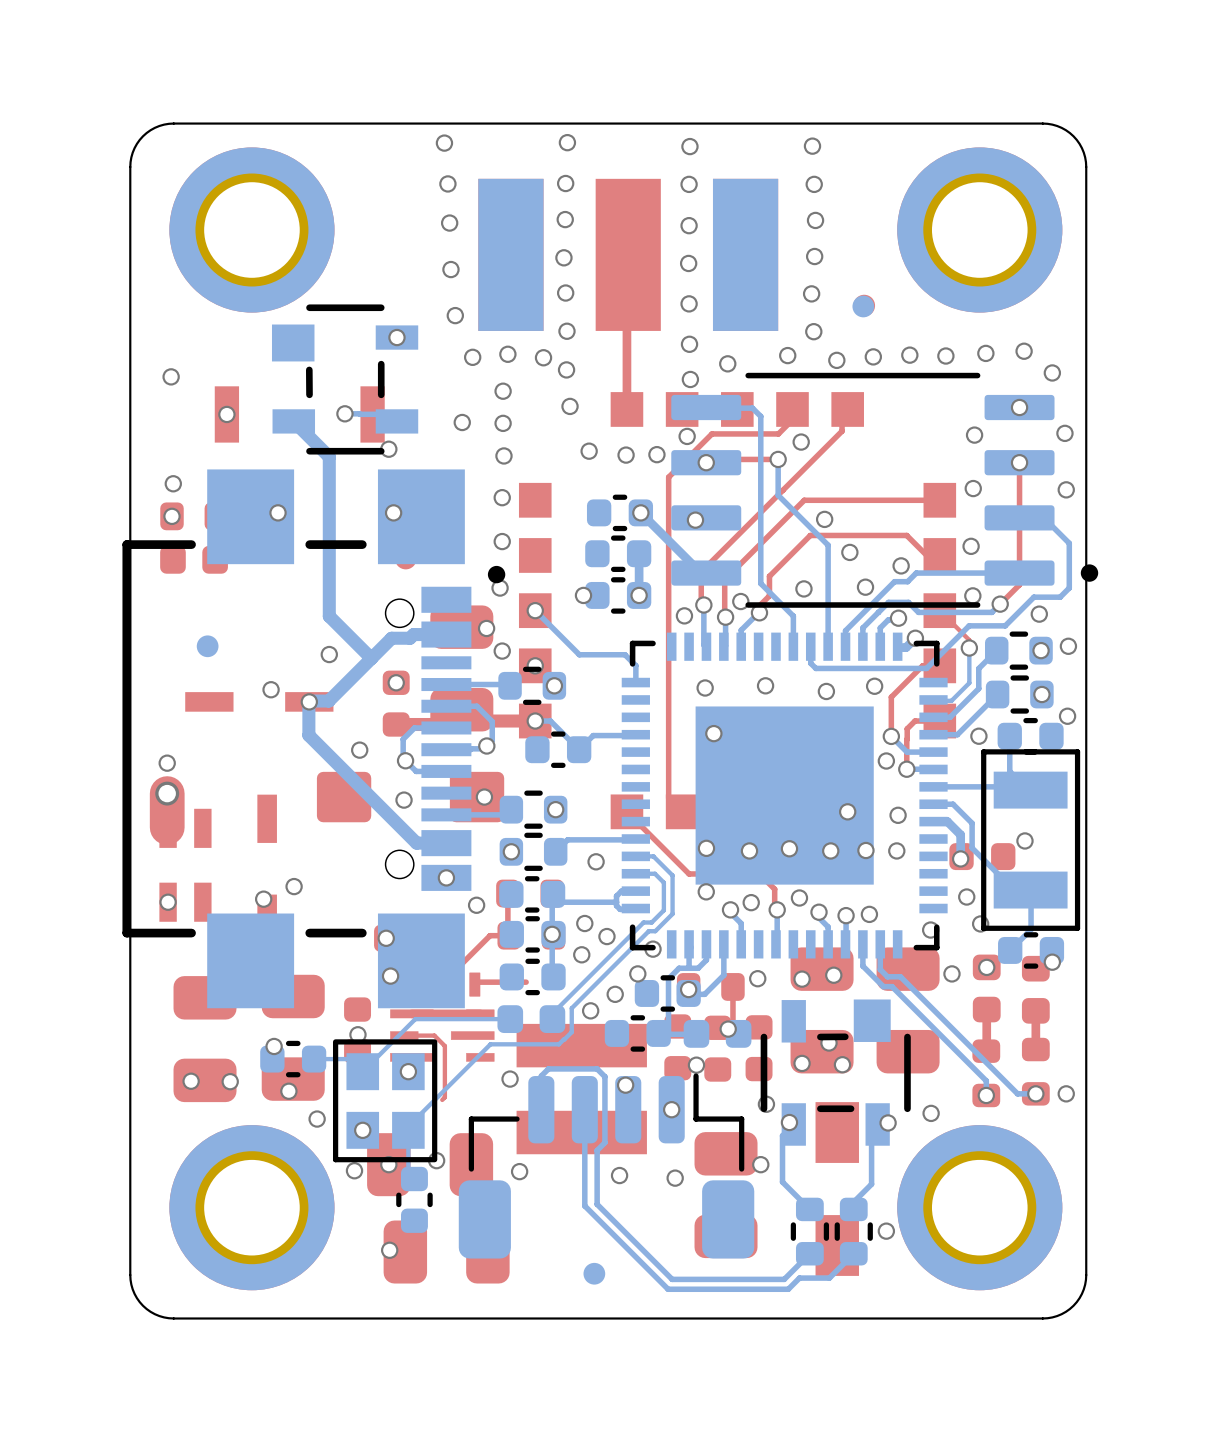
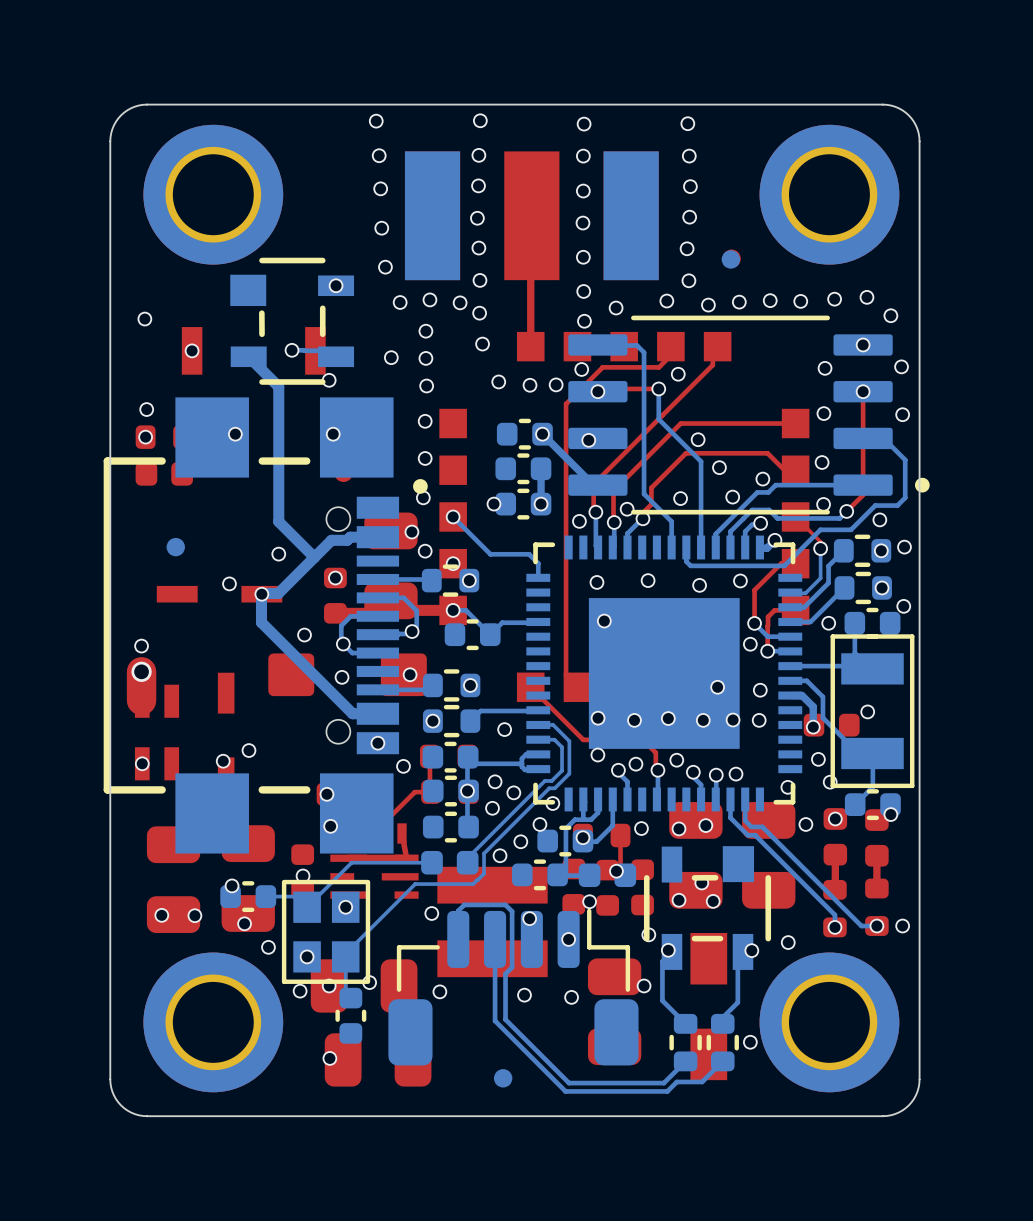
top track: (526, 982) (477, 982) -> none
top track: none -> (402, 833) (406, 858)
top track: (404, 1035) (434, 1035) (444, 1046) (444, 1097) (442, 1099) -> none

